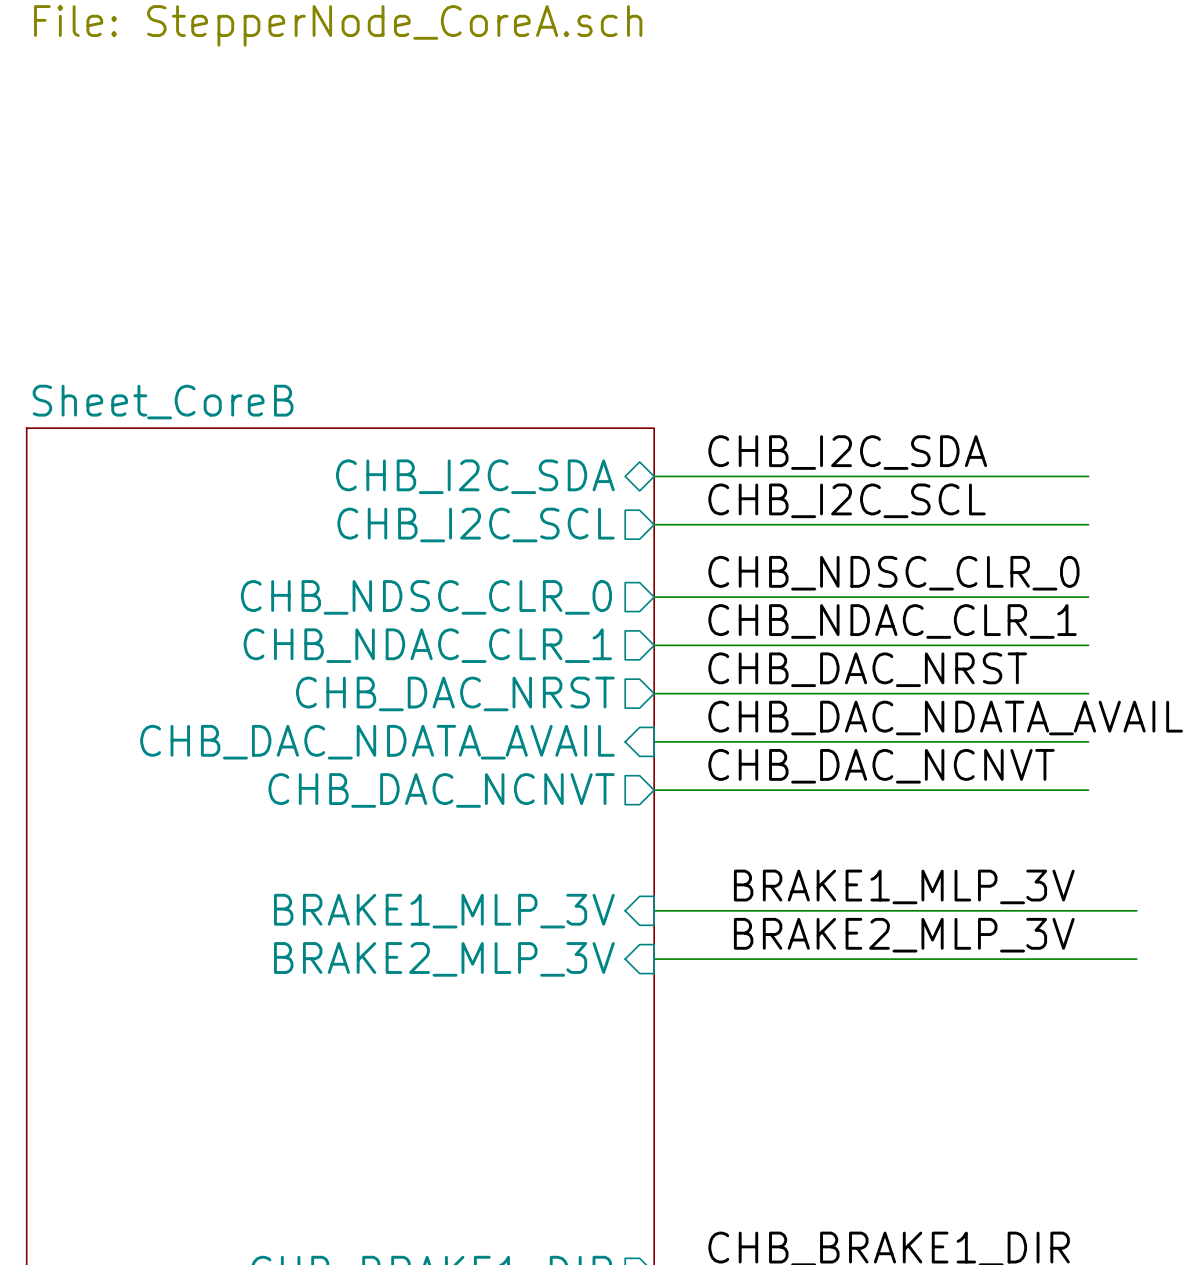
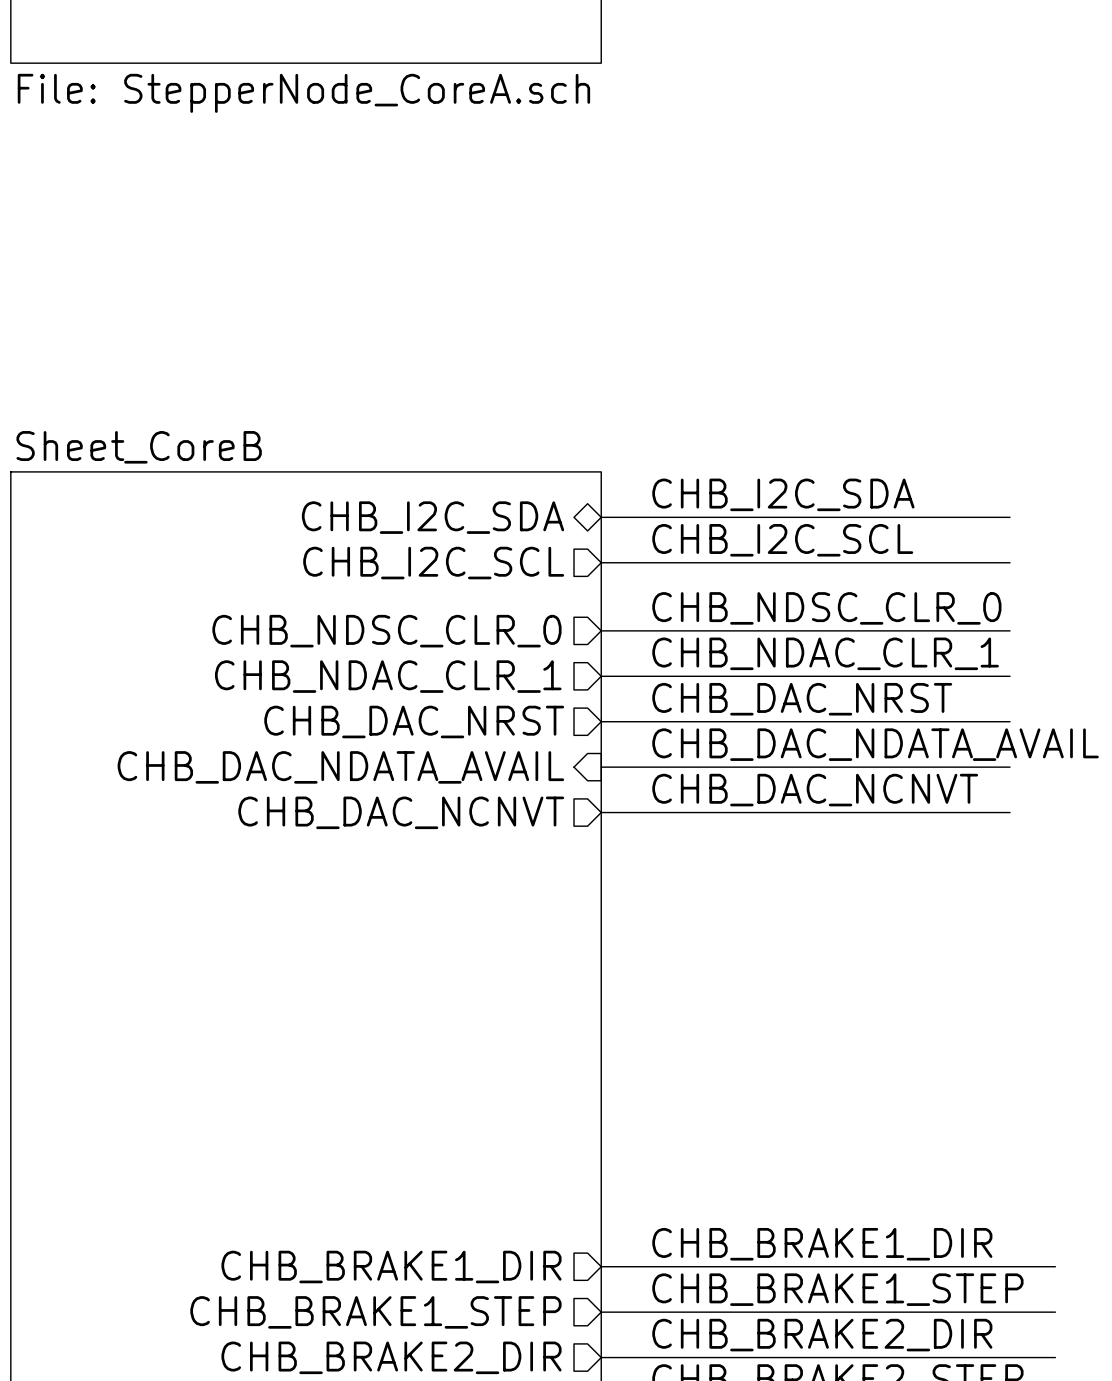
label: BRAKE1_MLP_3V (904, 886) -> none
wire: (654, 910) (1136, 910) -> none
sheet pin: BRAKE1_MLP_3V (444, 911) -> none
label: BRAKE2_MLP_3V (904, 935) -> none
sheet pin: BRAKE2_MLP_3V (444, 959) -> none
wire: (654, 959) (1136, 959) -> none

